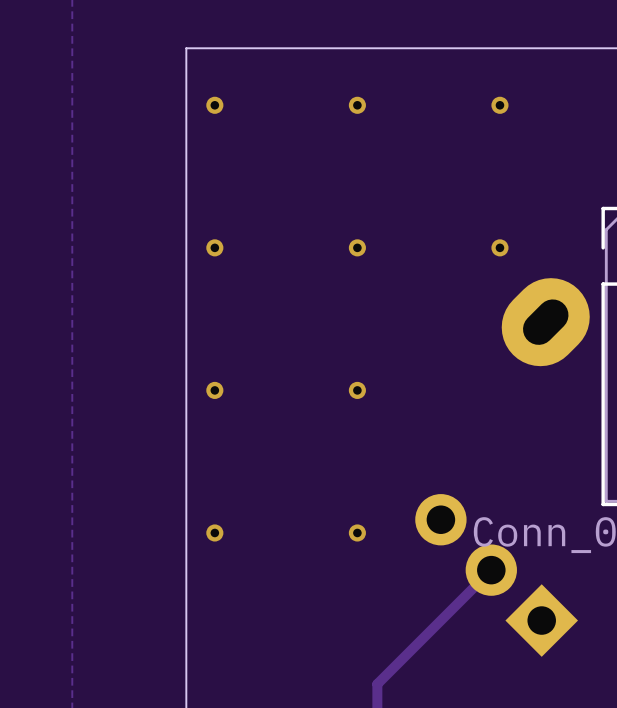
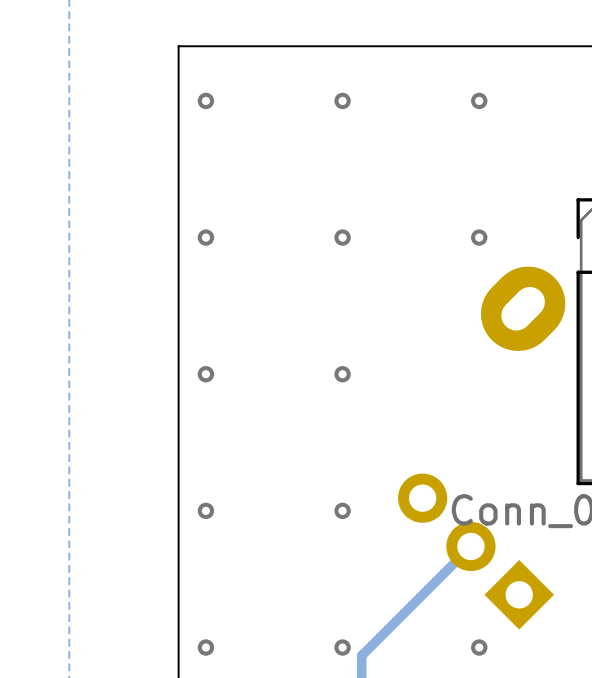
via: none -> (205, 647)
via: none -> (342, 647)
via: none -> (479, 647)

